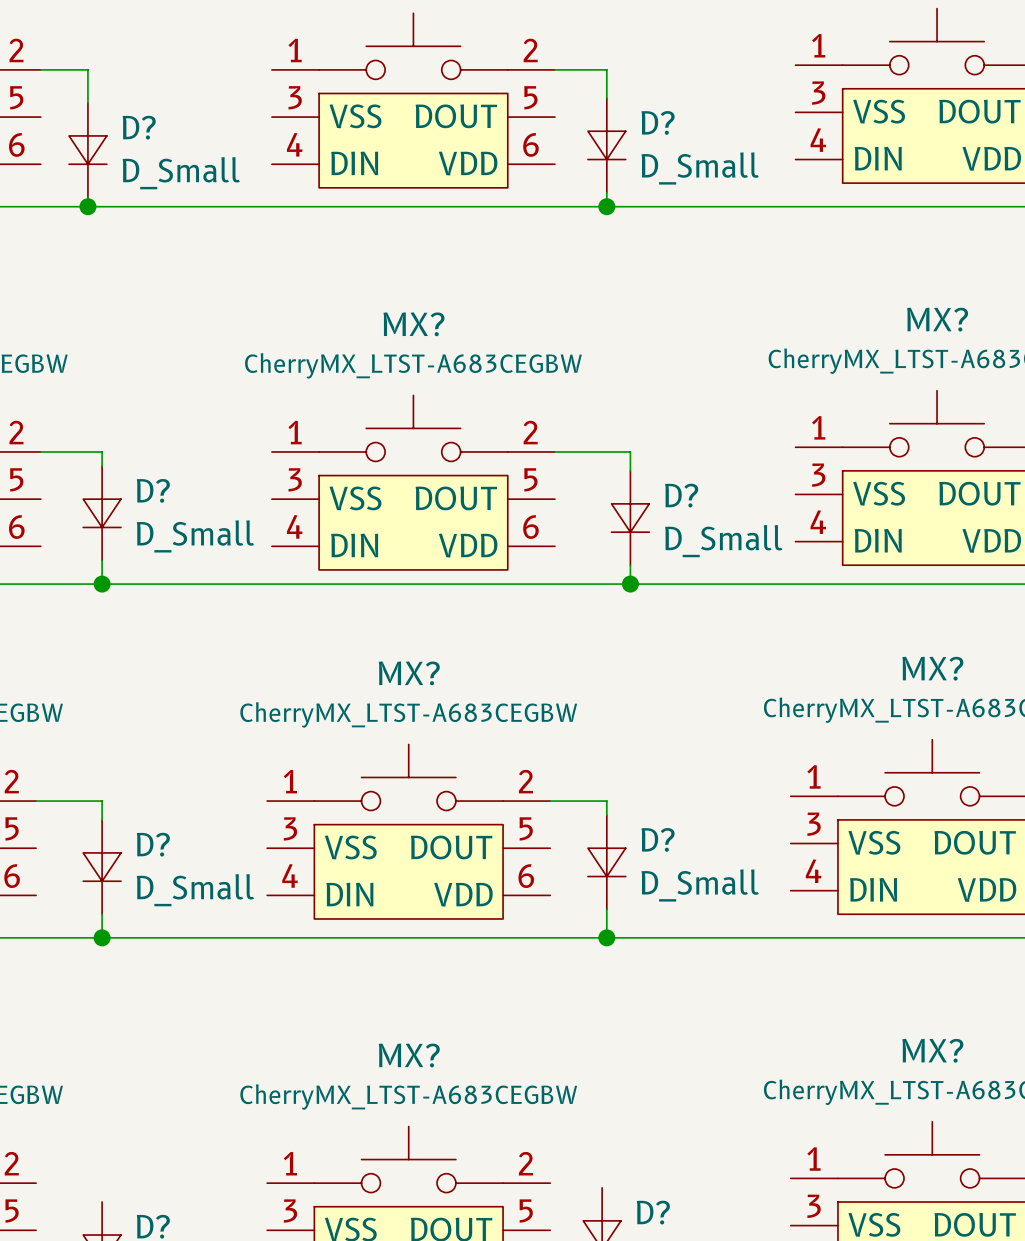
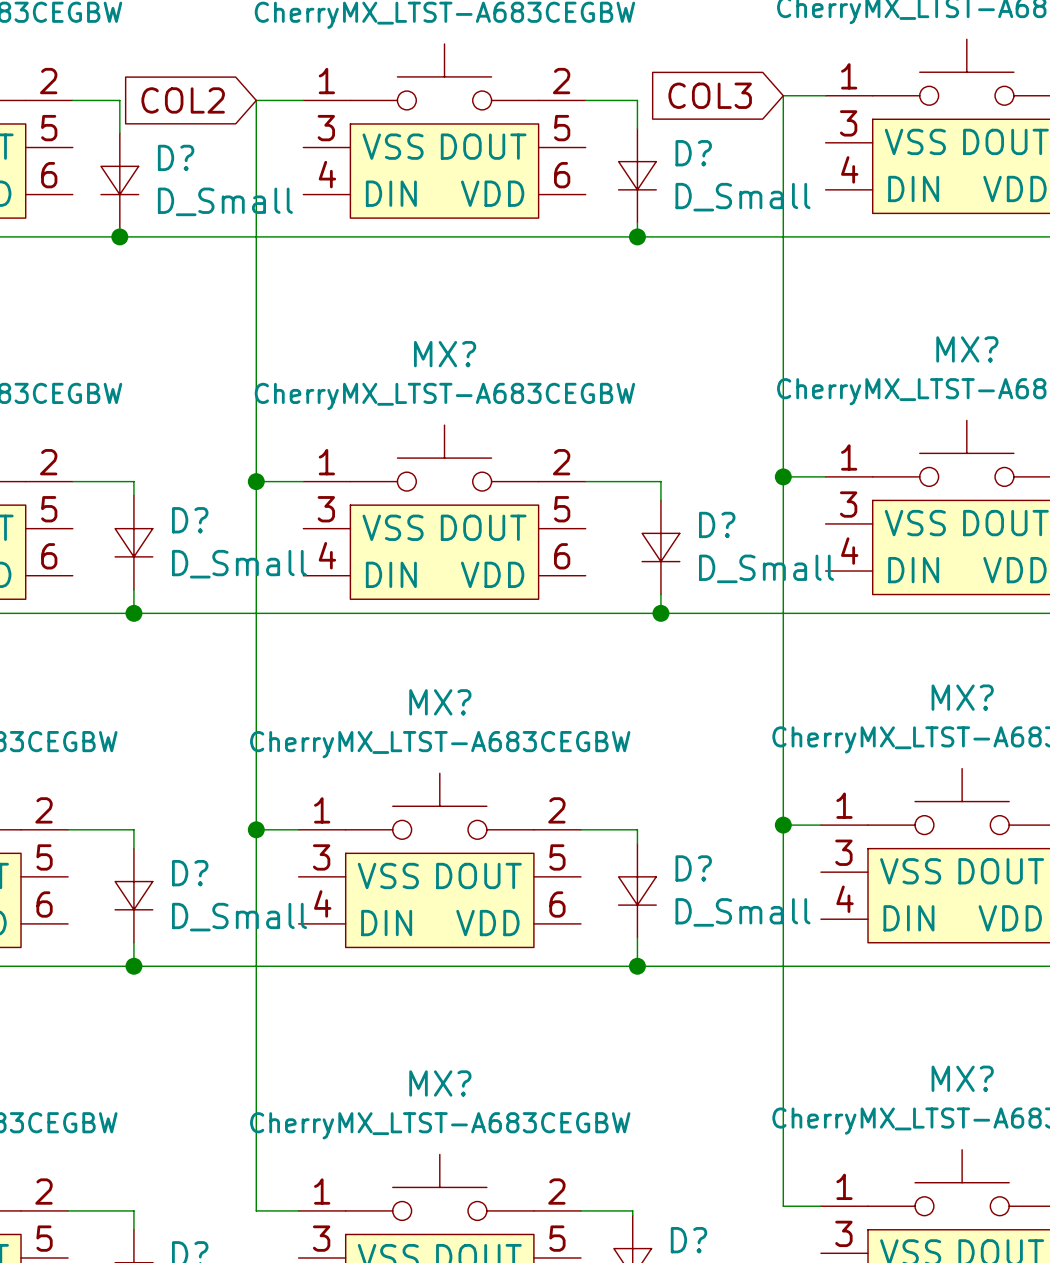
global label: none -> COL3 (710, 95)
wire: none -> (825, 95) (783, 95) (783, 1206) (820, 1206)
wire: none -> (303, 100) (256, 100) (256, 1210) (298, 1210)
global label: none -> COL2 (183, 100)
wire: none -> (783, 476) (825, 476)
junction: none -> (783, 476)
wire: none -> (256, 481) (303, 481)
junction: none -> (256, 481)
wire: none -> (783, 825) (820, 825)
junction: none -> (783, 825)
wire: none -> (256, 829) (298, 829)
junction: none -> (256, 829)
wire: none -> (68, 1210) (133, 1210) (133, 1229)
wire: none -> (580, 1210) (632, 1210) (632, 1215)

